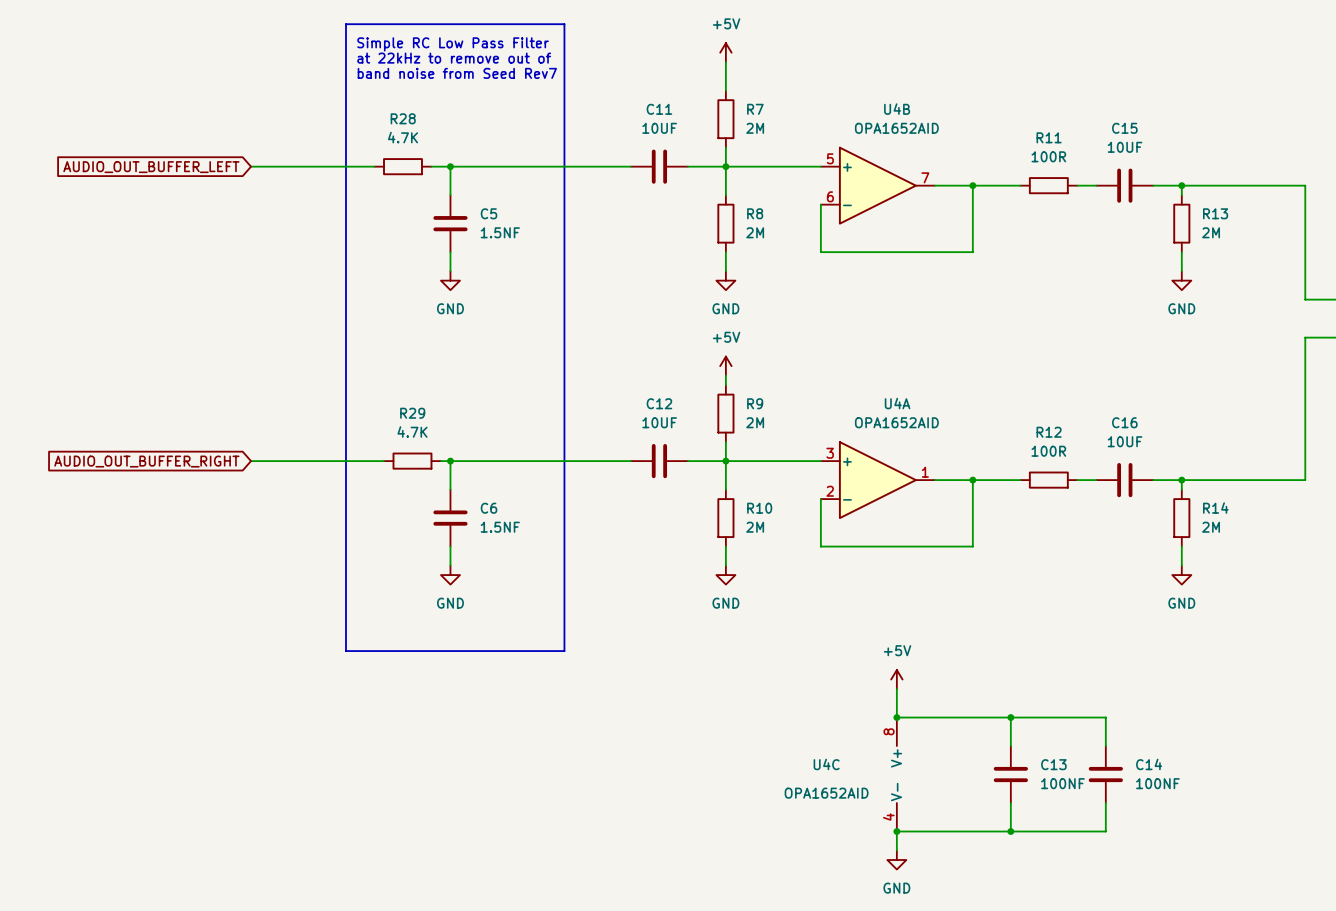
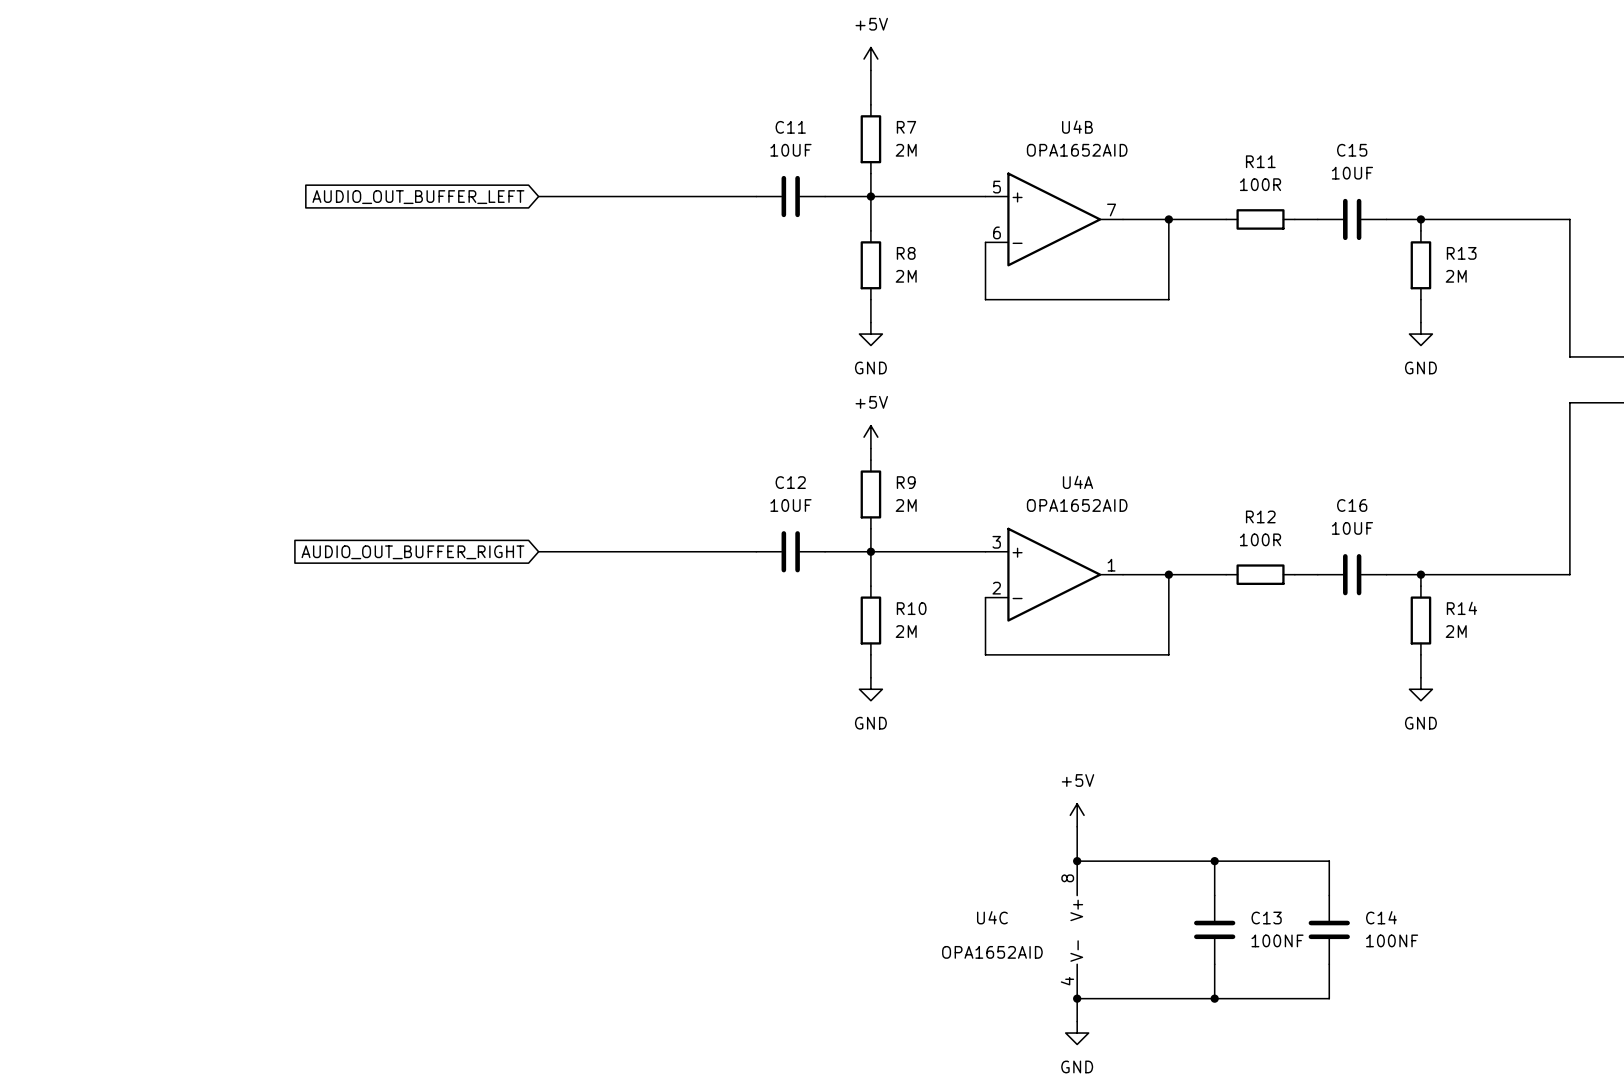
line: (345, 24) (564, 24) (564, 651) (345, 651) (345, 24) -> none
text: Simple RC Low Pass Filter (453, 44) -> none
text: at 22kHz to remove out of (454, 58) -> none
text: band noise from Seed Rev7 (457, 73) -> none
wire: (251, 166) (374, 166) -> none
R28: 4.7K (402, 166) -> none
wire: (431, 166) (450, 166) (450, 195) -> none
junction: (450, 166) -> none
global label: AUDIO_OUT_BUFFER_LEFT (151, 167) -> none
global label: none -> AUDIO_OUT_BUFFER_LEFT (418, 197)
C5: 1.5NF (450, 223) -> none
wire: (450, 252) (450, 271) -> none
power symbol: GND (450, 280) -> none
global label: AUDIO_OUT_BUFFER_RIGHT (146, 461) -> none
wire: (251, 461) (383, 461) -> none
global label: none -> AUDIO_OUT_BUFFER_RIGHT (412, 552)
R29: 4.7K (412, 461) -> none
wire: (440, 461) (450, 461) (450, 489) -> none
junction: (450, 461) -> none
C6: 1.5NF (450, 518) -> none
wire: (450, 546) (450, 565) -> none
power symbol: GND (450, 575) -> none

